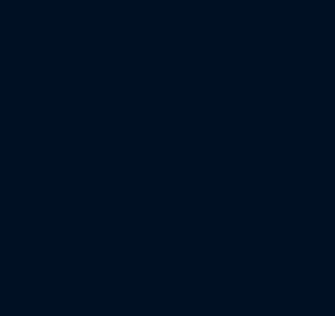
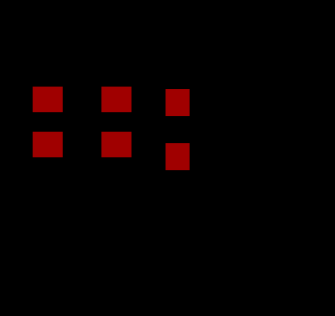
part: none -> (47, 121)
part: none -> (116, 121)
part: none -> (177, 129)

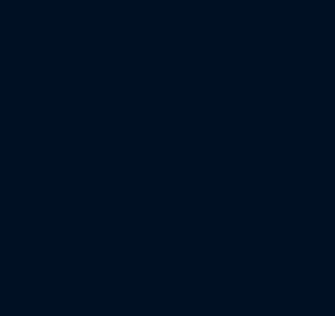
part: (47, 121) -> none
part: (116, 121) -> none
part: (177, 129) -> none

